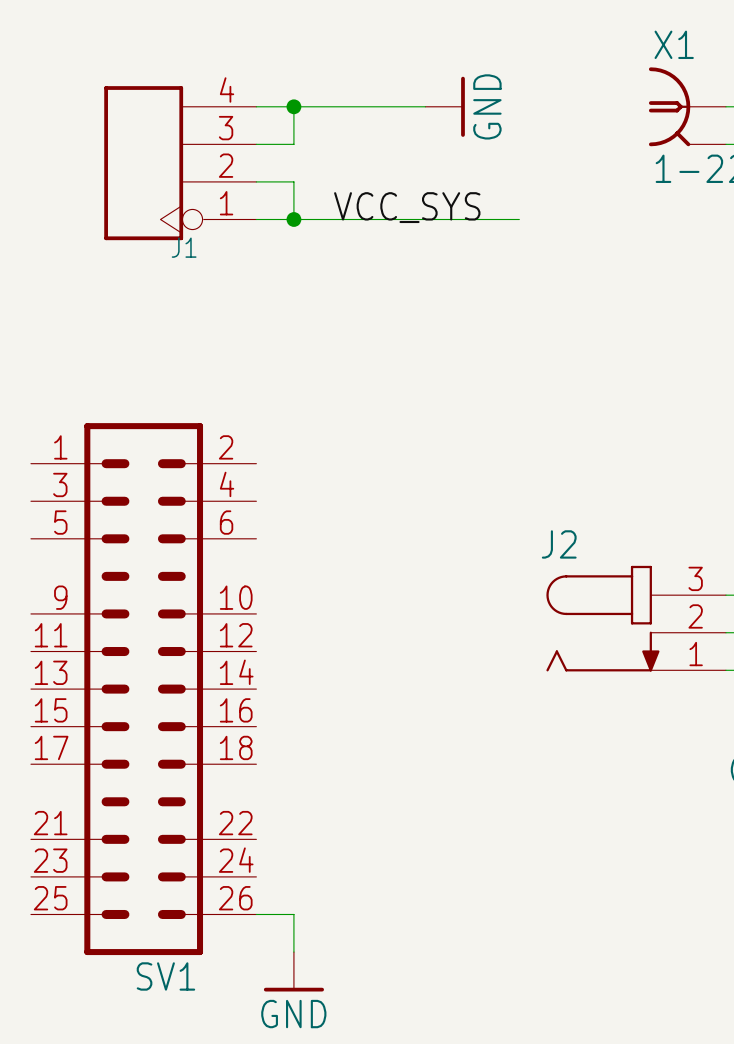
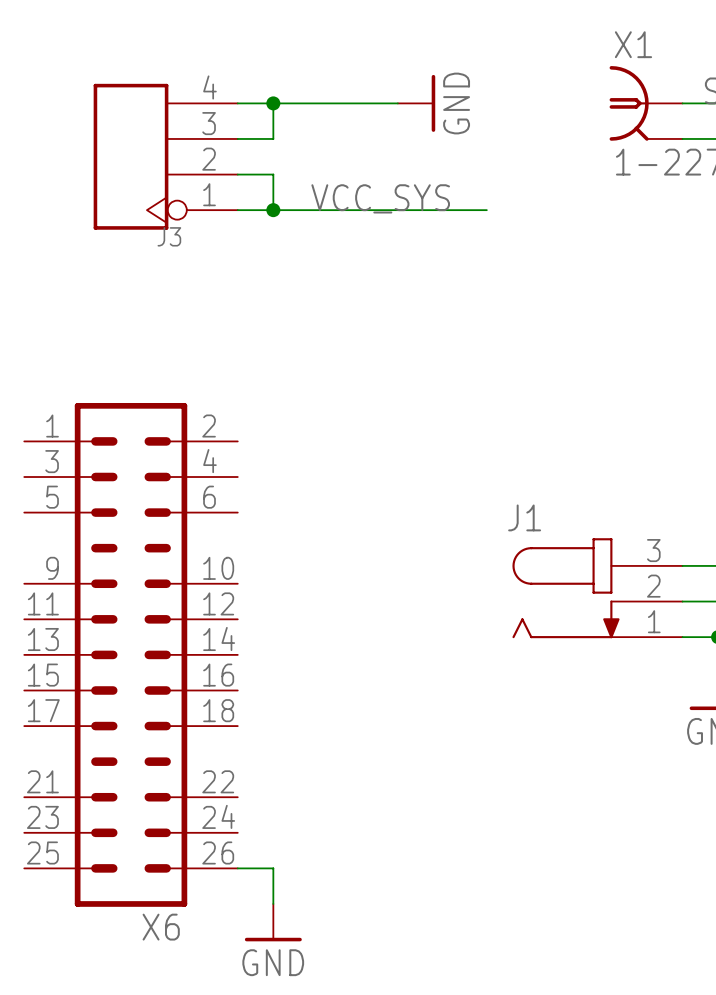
J1 name: J1 (184, 247) -> J3 (169, 236)
J2 name: J2 (559, 544) -> J1 (524, 517)
SV1 name: SV1 (165, 976) -> X6 (161, 927)

